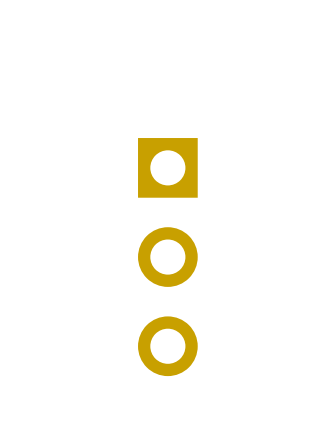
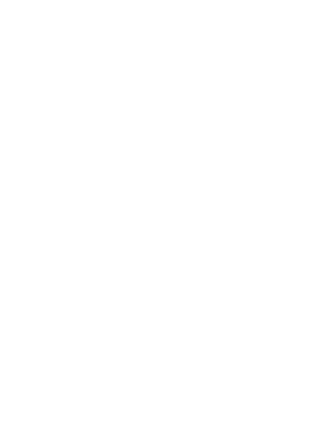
part: (167, 257) -> none

